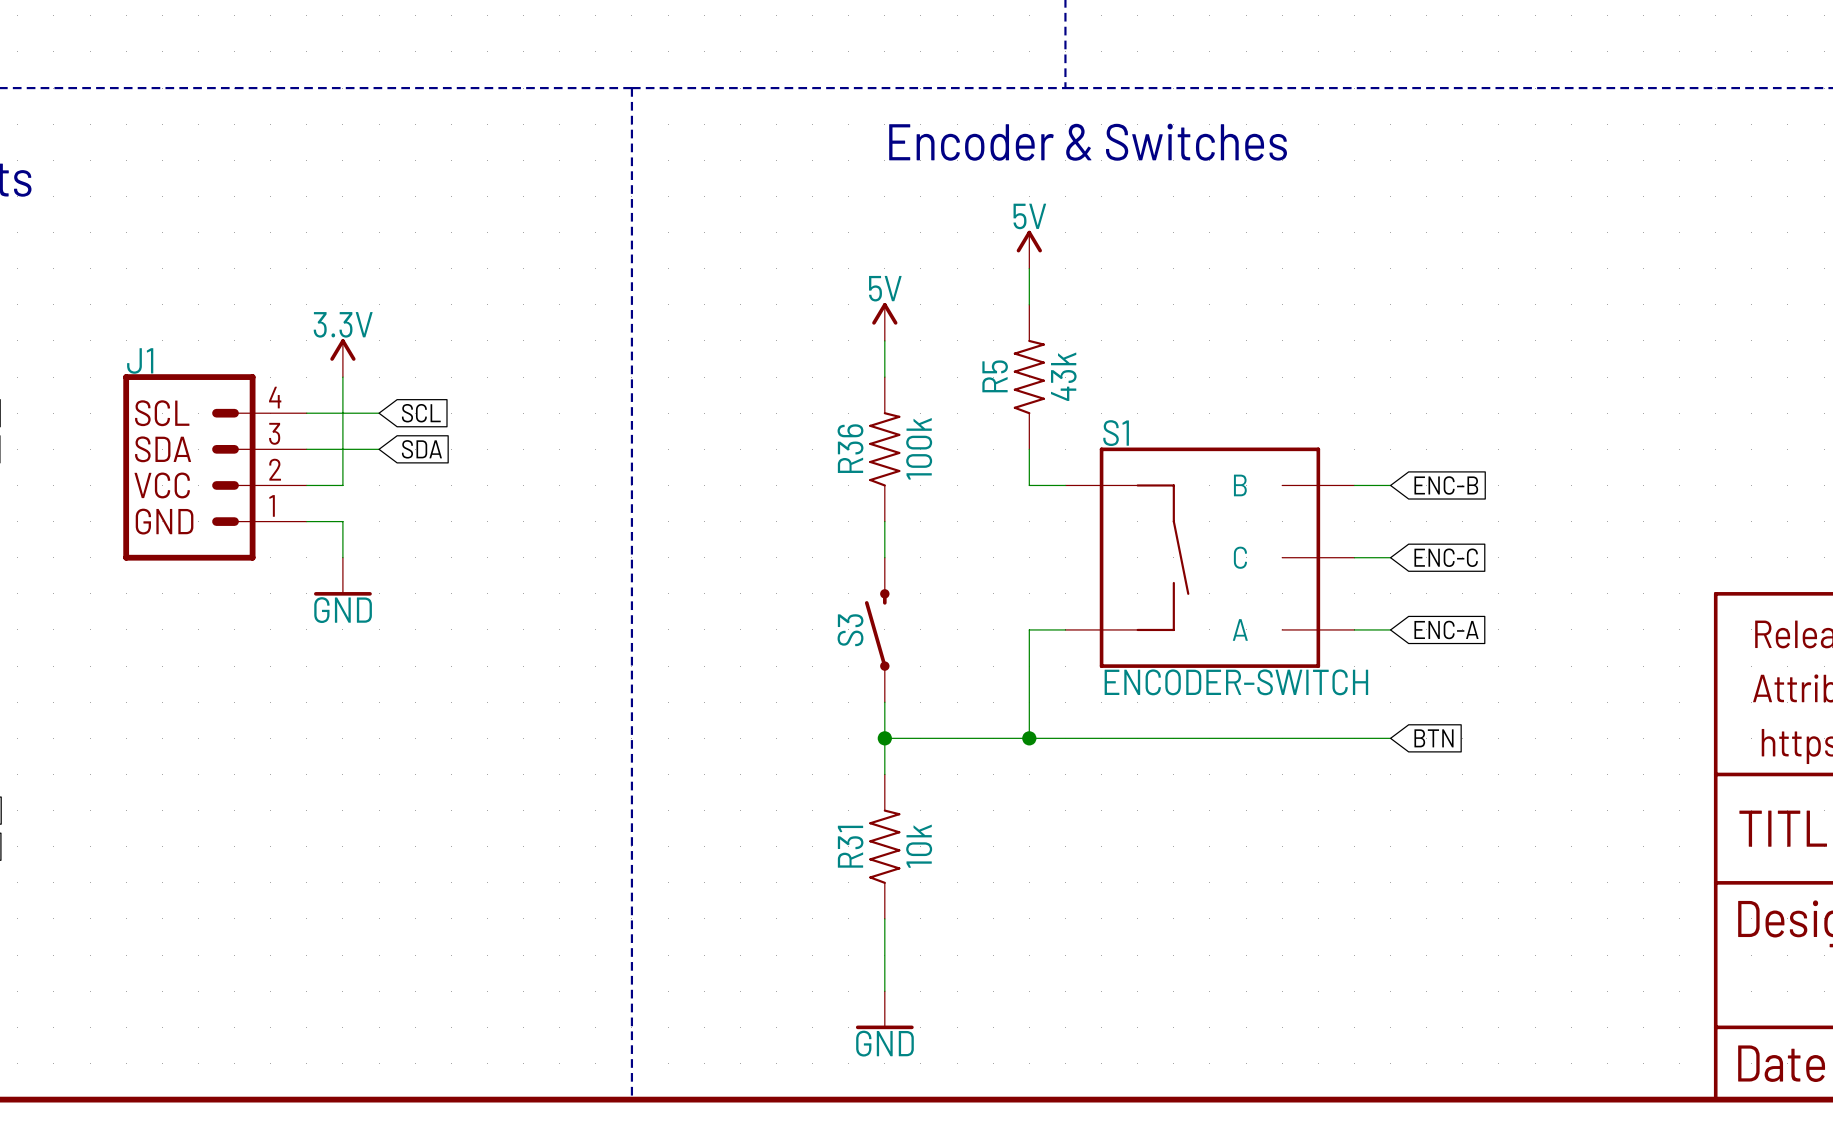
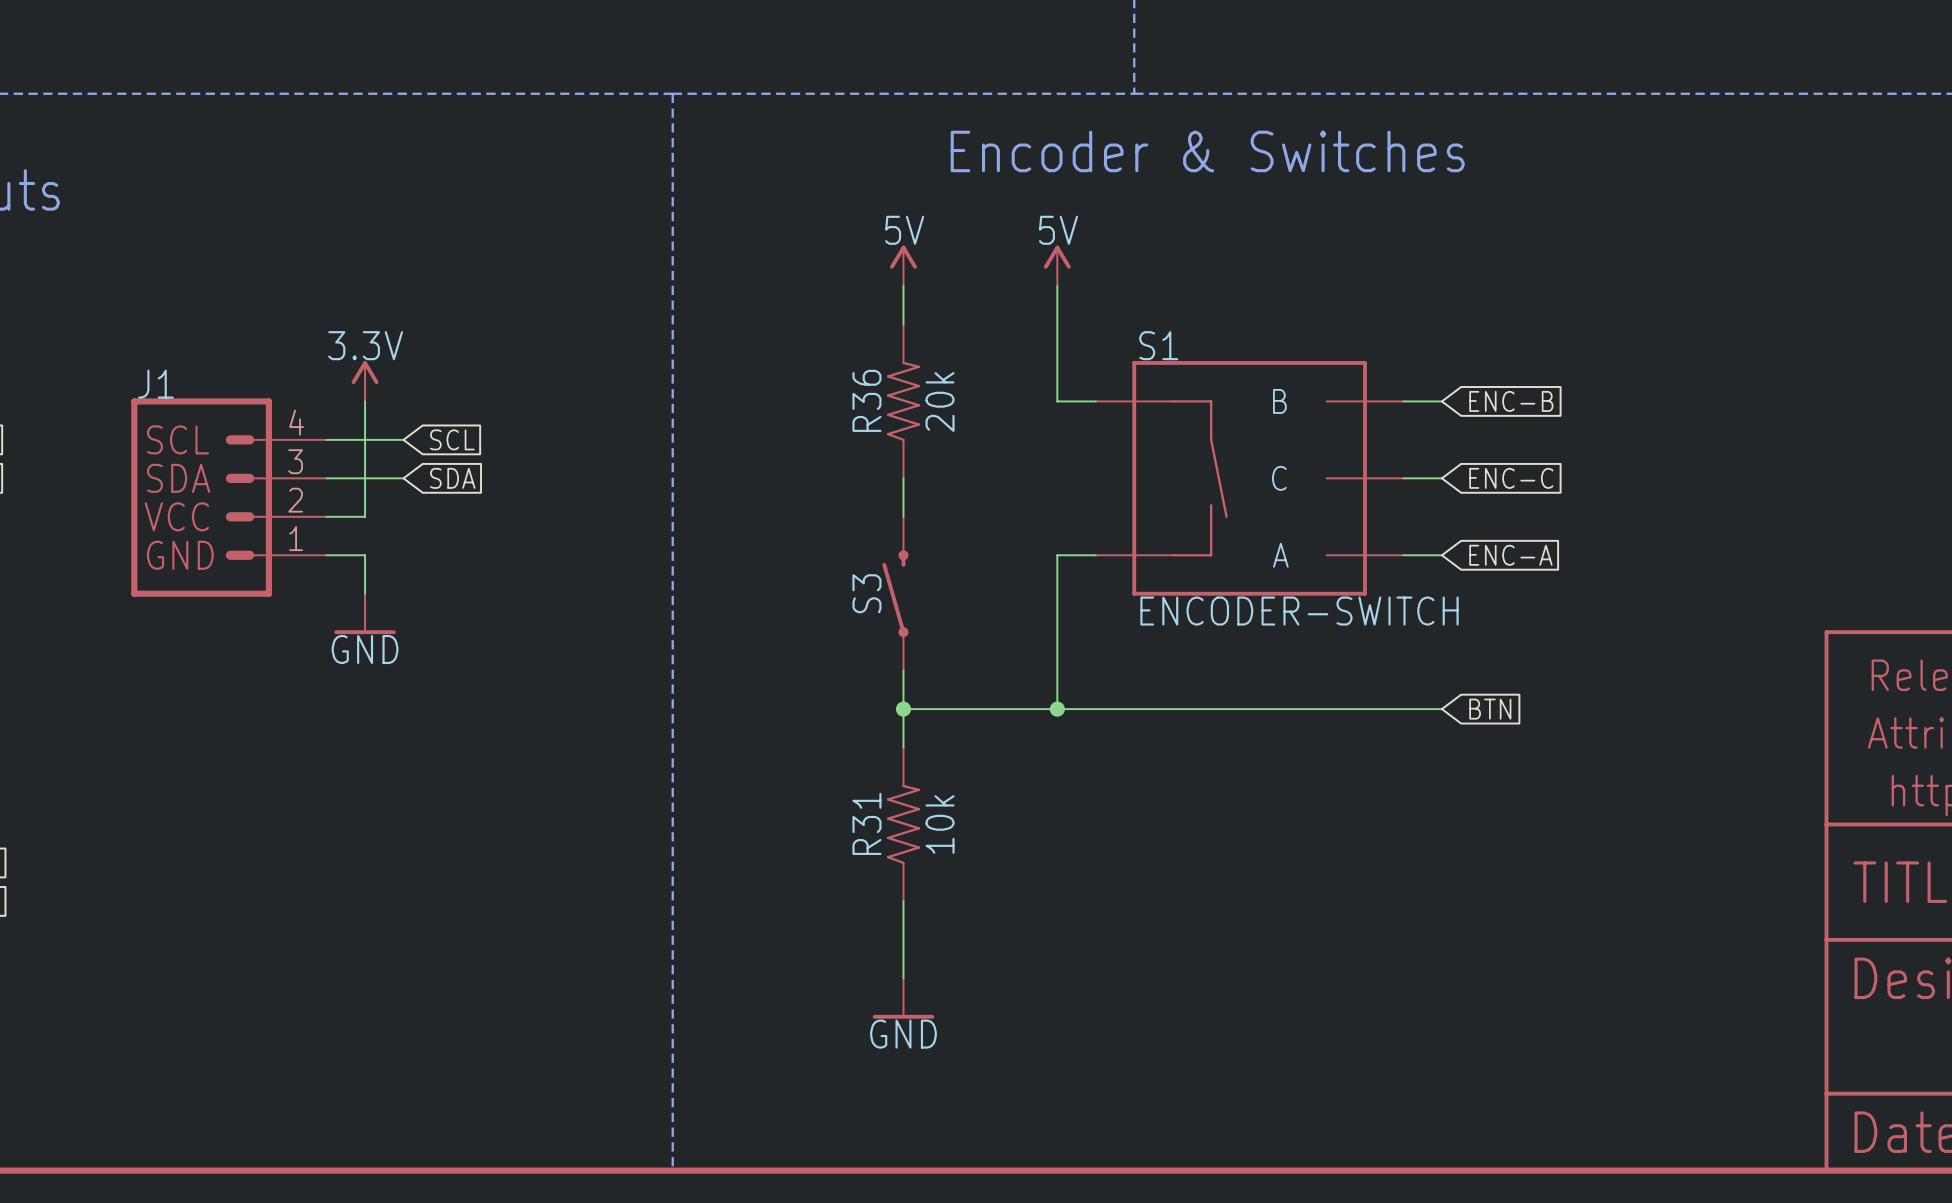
power symbol: none -> 5V (903, 265)
power symbol position: 5V (1029, 249) -> 5V (1057, 265)
wire: none -> (1057, 286) (1057, 401) (1095, 401)
wire: (1029, 268) (1029, 304) -> none
power symbol: 5V (884, 321) -> none
wire: (884, 340) (884, 377) -> (903, 286) (903, 324)
R5: 43k (1029, 377) -> none
R36 value: 100k (919, 448) -> 20k (940, 402)
R36 position: (884, 449) -> (903, 401)
wire: (1029, 449) (1029, 485) (1065, 485) -> none
wire: (1354, 485) (1390, 485) -> (1403, 401) (1441, 401)
global label position: ENC-B (1446, 485) -> ENC-B (1511, 401)
wire: (884, 521) (884, 557) -> (903, 478) (903, 516)
wire: none -> (1095, 555) (1057, 555) (1057, 709)
S1 position: (1209, 557) -> (1249, 478)
wire: (1354, 557) (1390, 557) -> (1403, 478) (1441, 478)
global label position: ENC-C (1446, 557) -> ENC-C (1511, 478)
S3 position: (877, 629) -> (895, 593)
wire: (1065, 629) (1029, 629) (1029, 738) -> none
wire: (1354, 629) (1390, 629) -> (1403, 555) (1441, 555)
global label position: ENC-A (1446, 629) -> ENC-A (1510, 555)
junction: none -> (903, 709)
junction: none -> (1057, 709)
wire: (884, 702) (884, 774) -> (903, 670) (903, 747)
wire: (884, 738) (1390, 738) -> (903, 709) (1441, 709)
junction: (884, 738) -> none
junction: (1029, 738) -> none
global label position: BTN (1434, 738) -> BTN (1490, 709)
R31 position: (884, 846) -> (903, 824)
wire: (884, 918) (884, 991) -> (903, 901) (903, 978)
power symbol position: GND (884, 1010) -> GND (903, 998)

